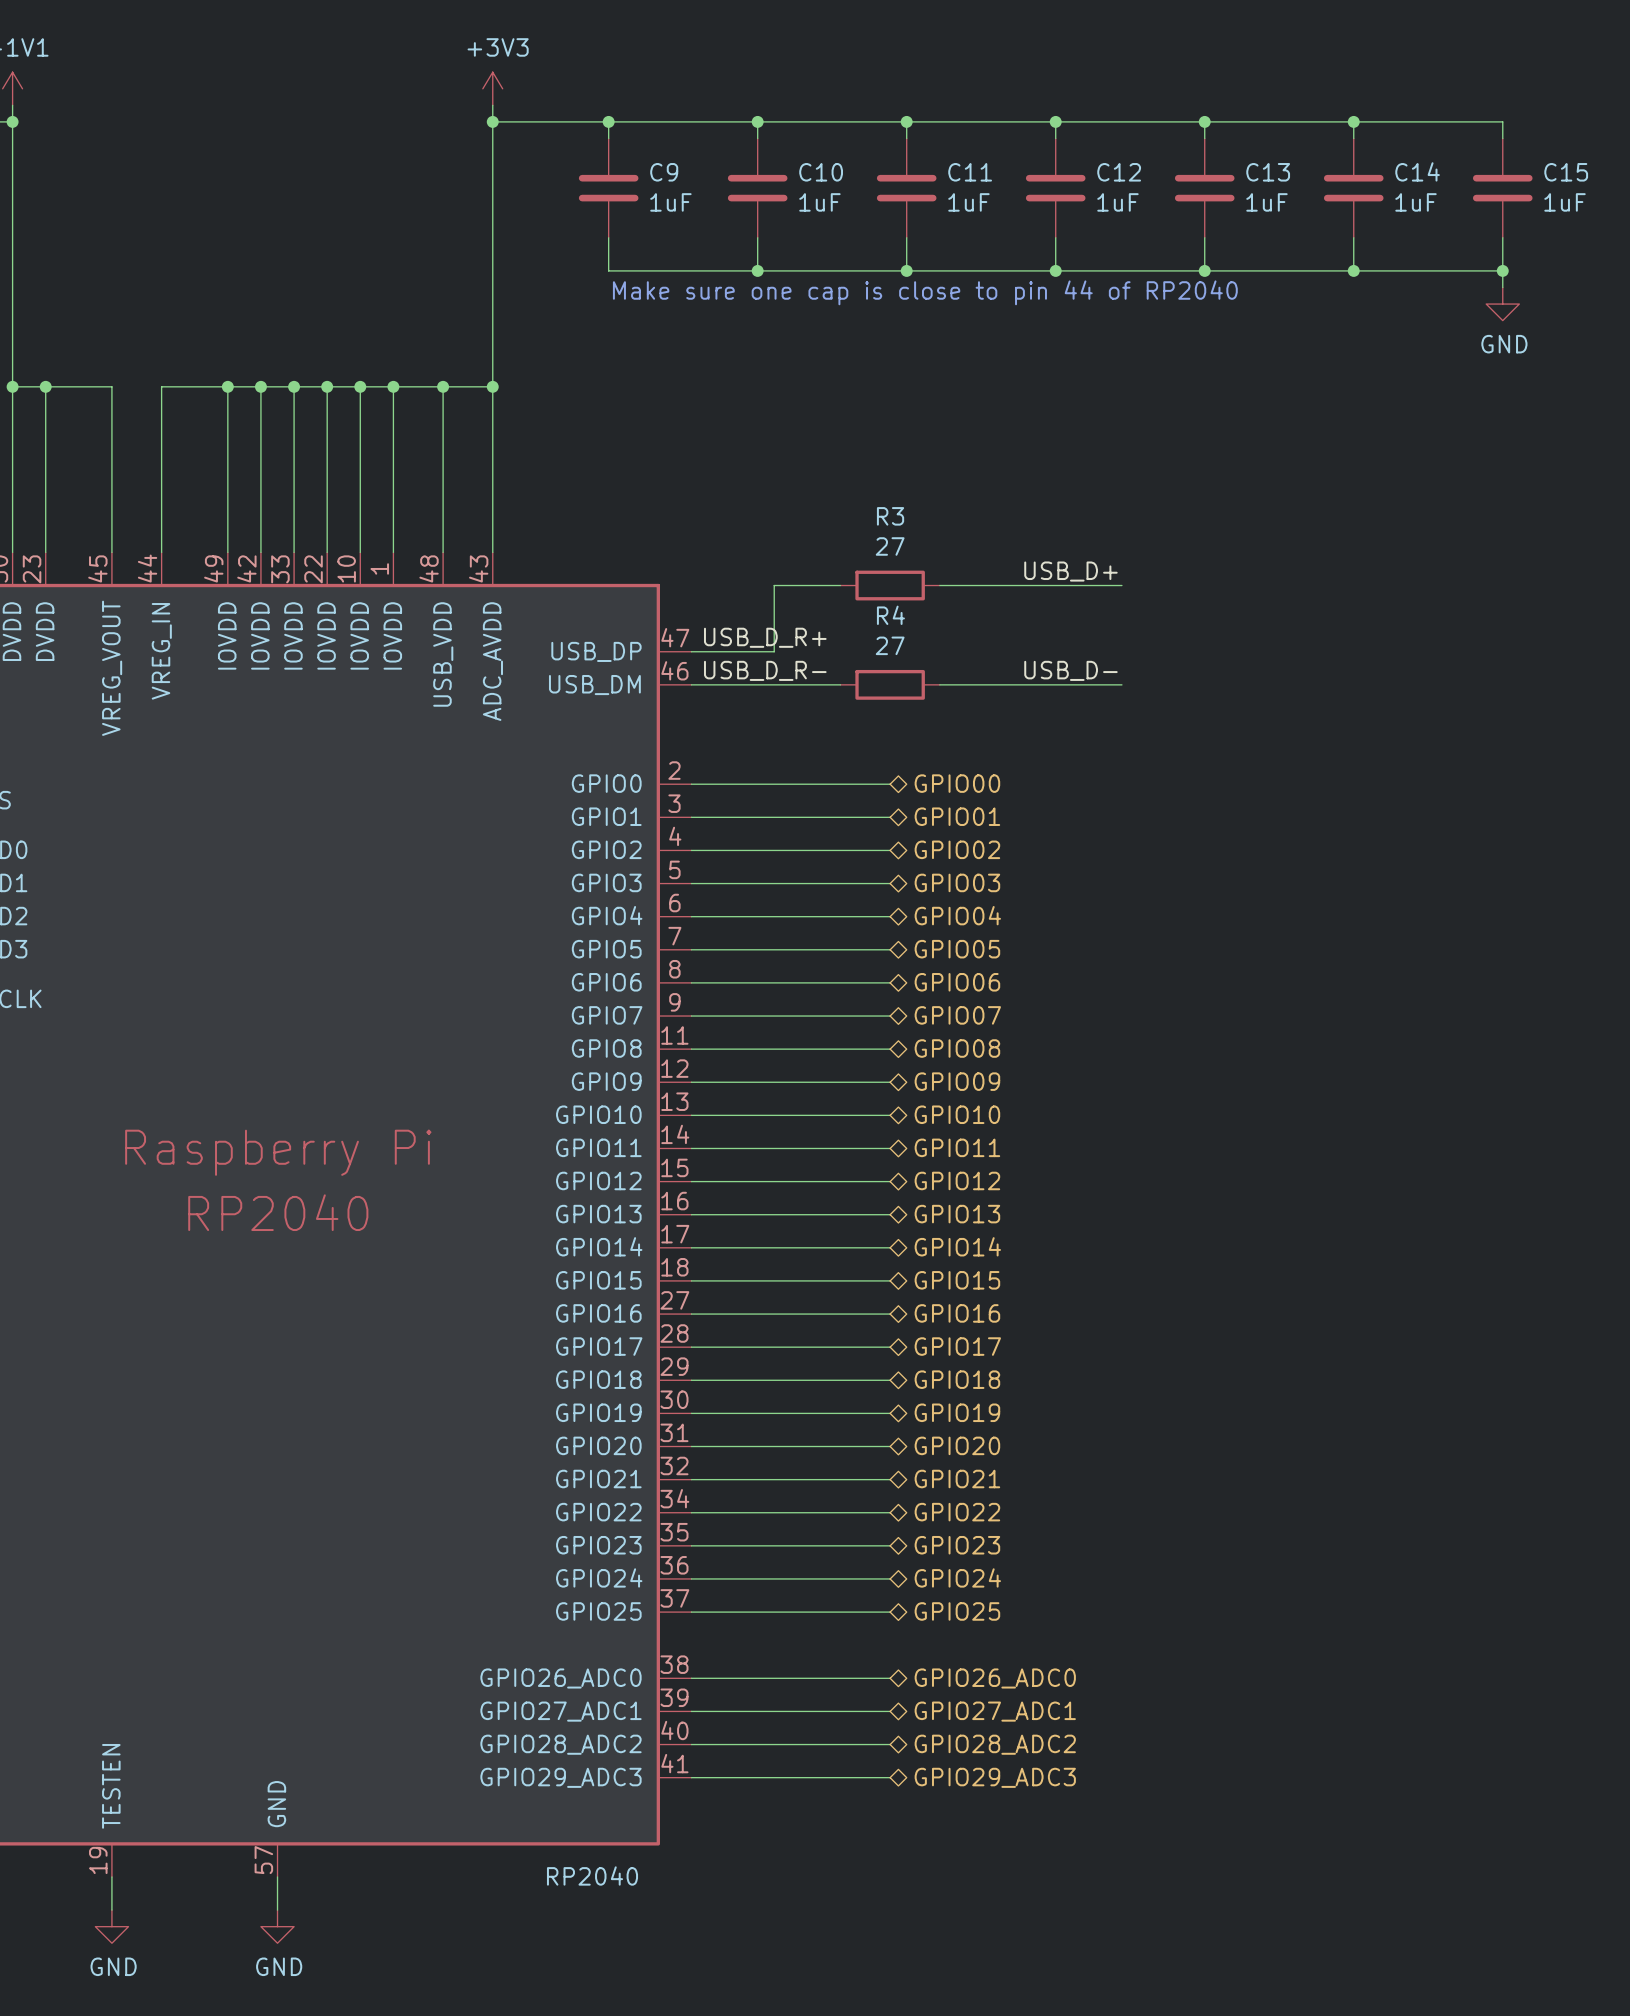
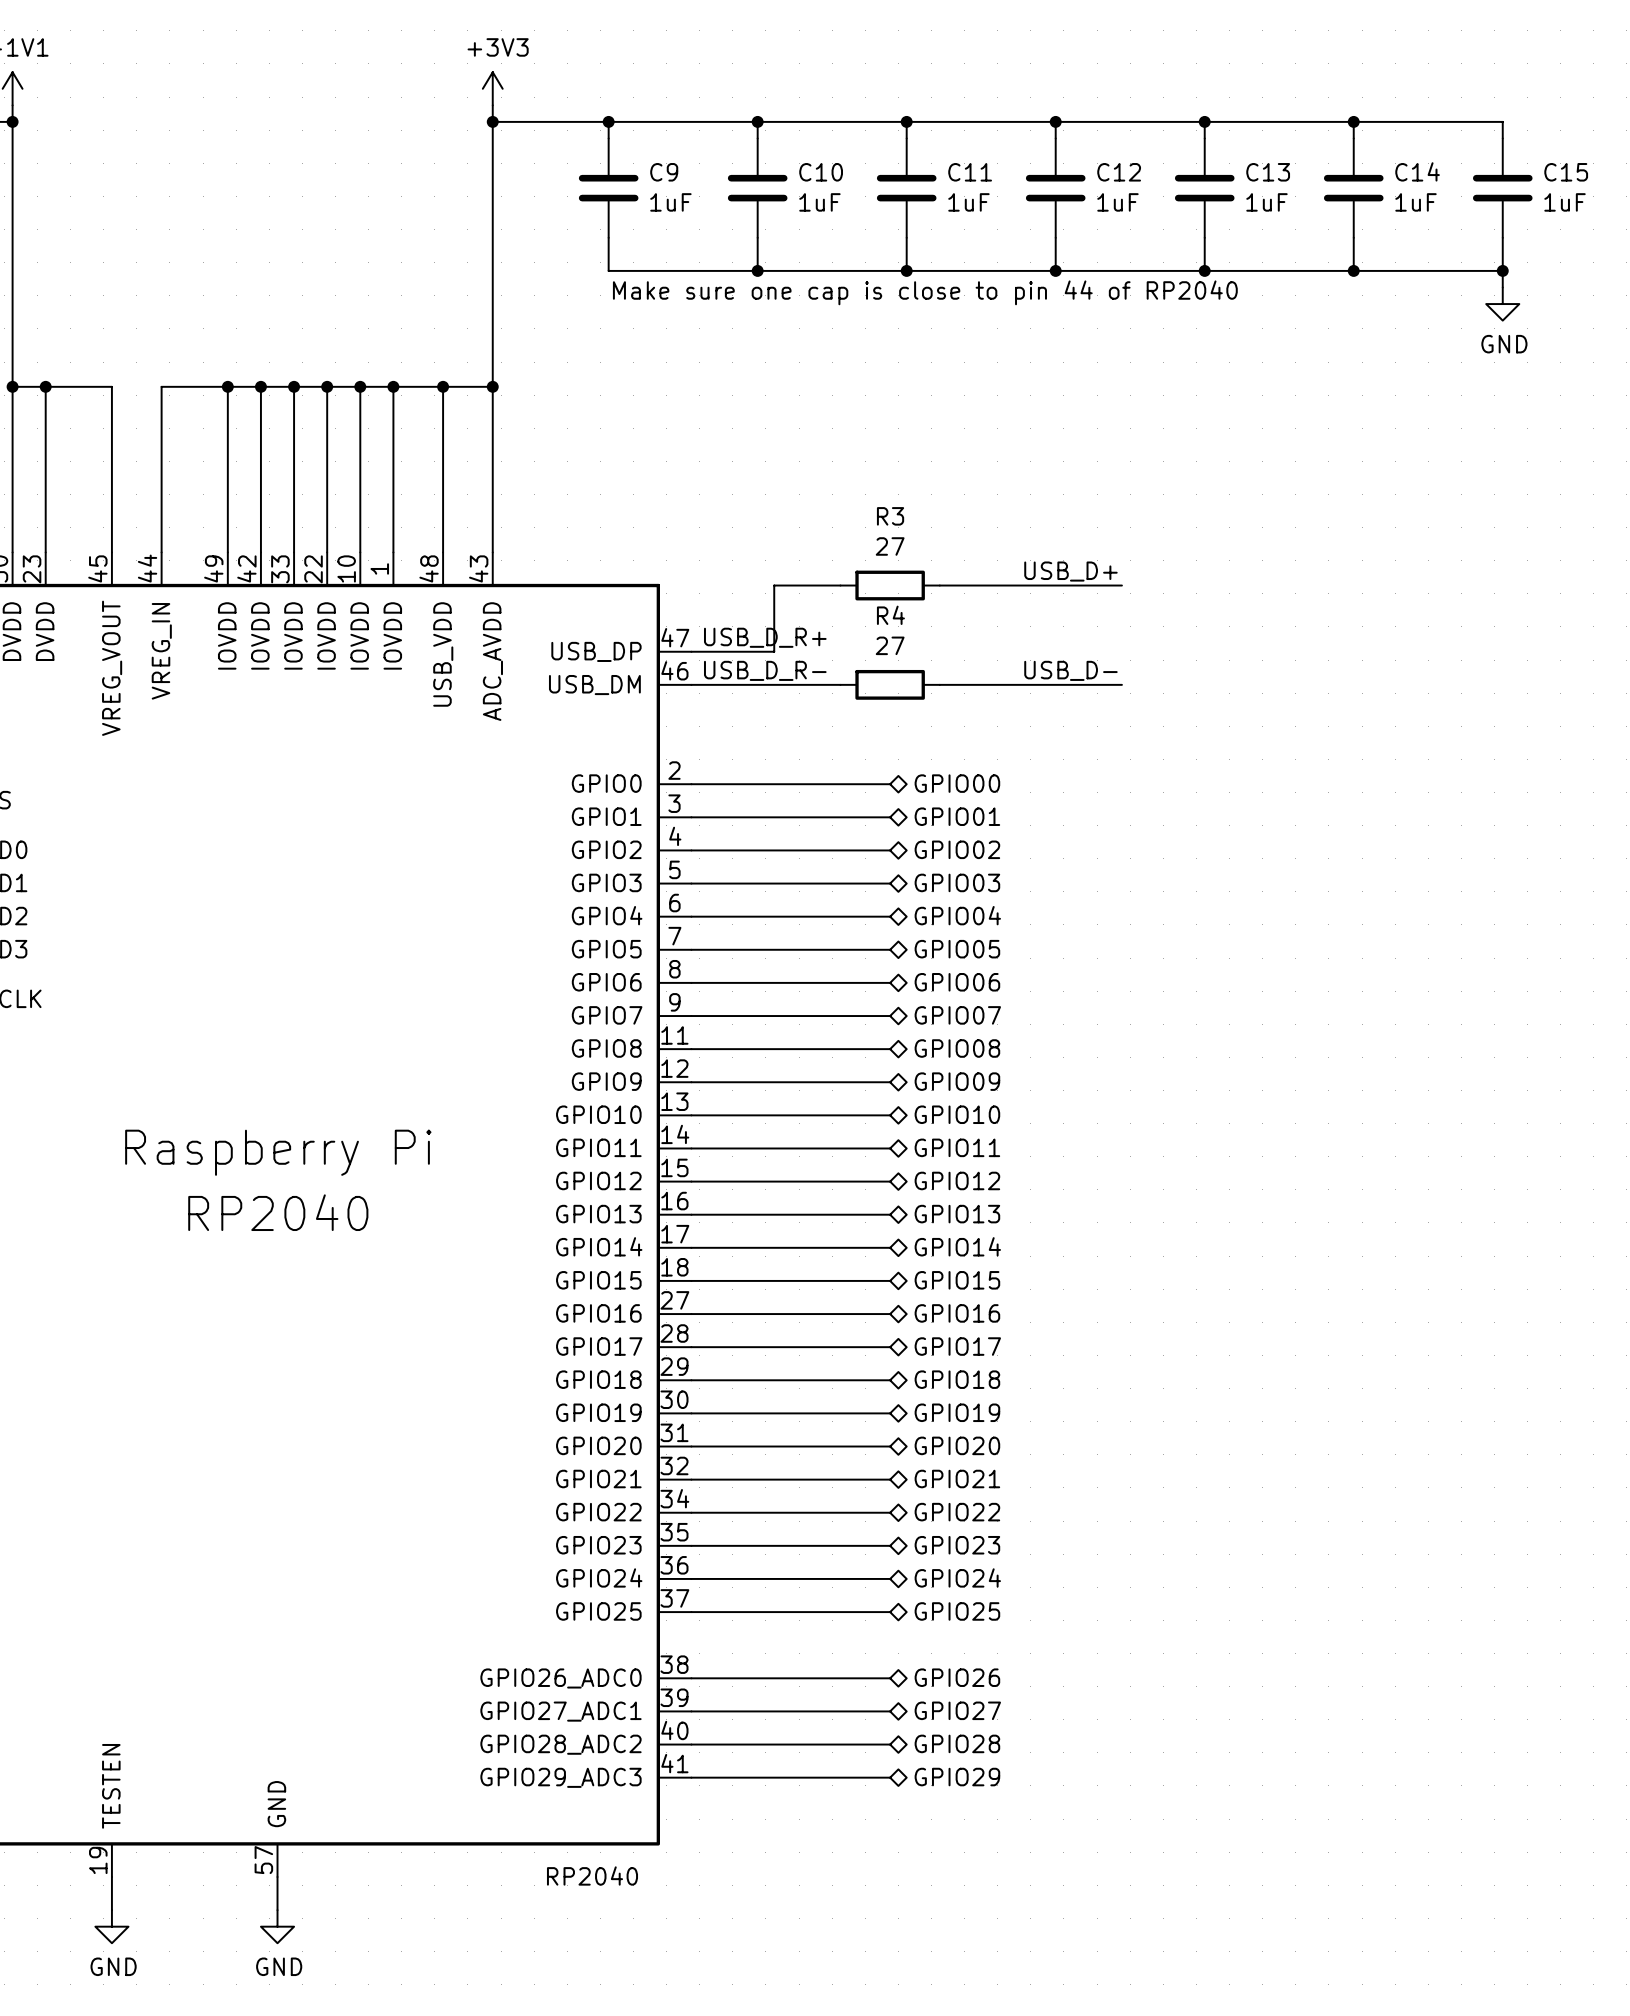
hierarchical label: GPIO26_ADC0 (995, 1678) -> GPIO26 (957, 1677)
hierarchical label: GPIO27_ADC1 (995, 1711) -> GPIO27 (957, 1710)
hierarchical label: GPIO28_ADC2 (995, 1744) -> GPIO28 (957, 1743)
hierarchical label: GPIO29_ADC3 (995, 1777) -> GPIO29 (957, 1777)

